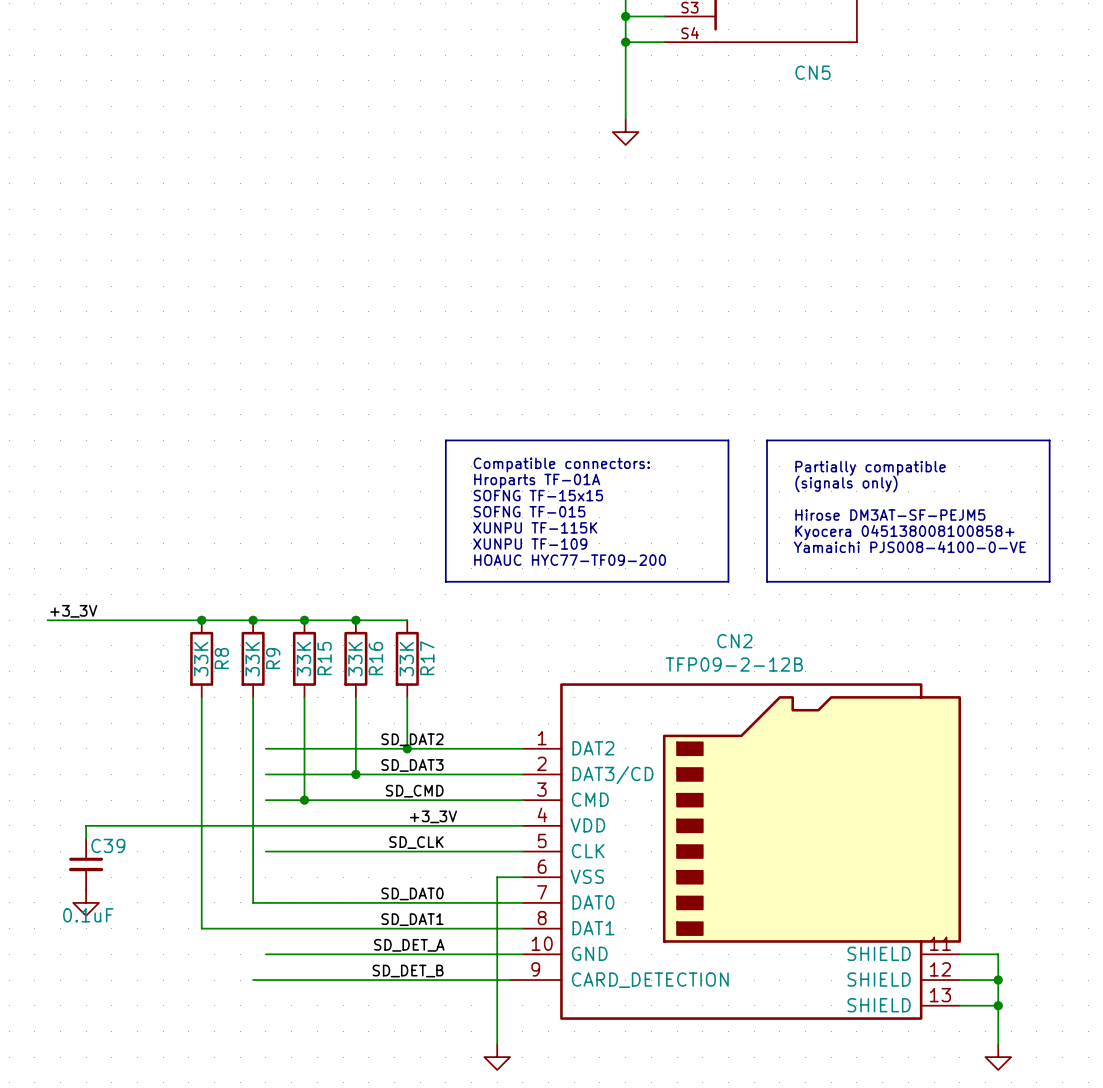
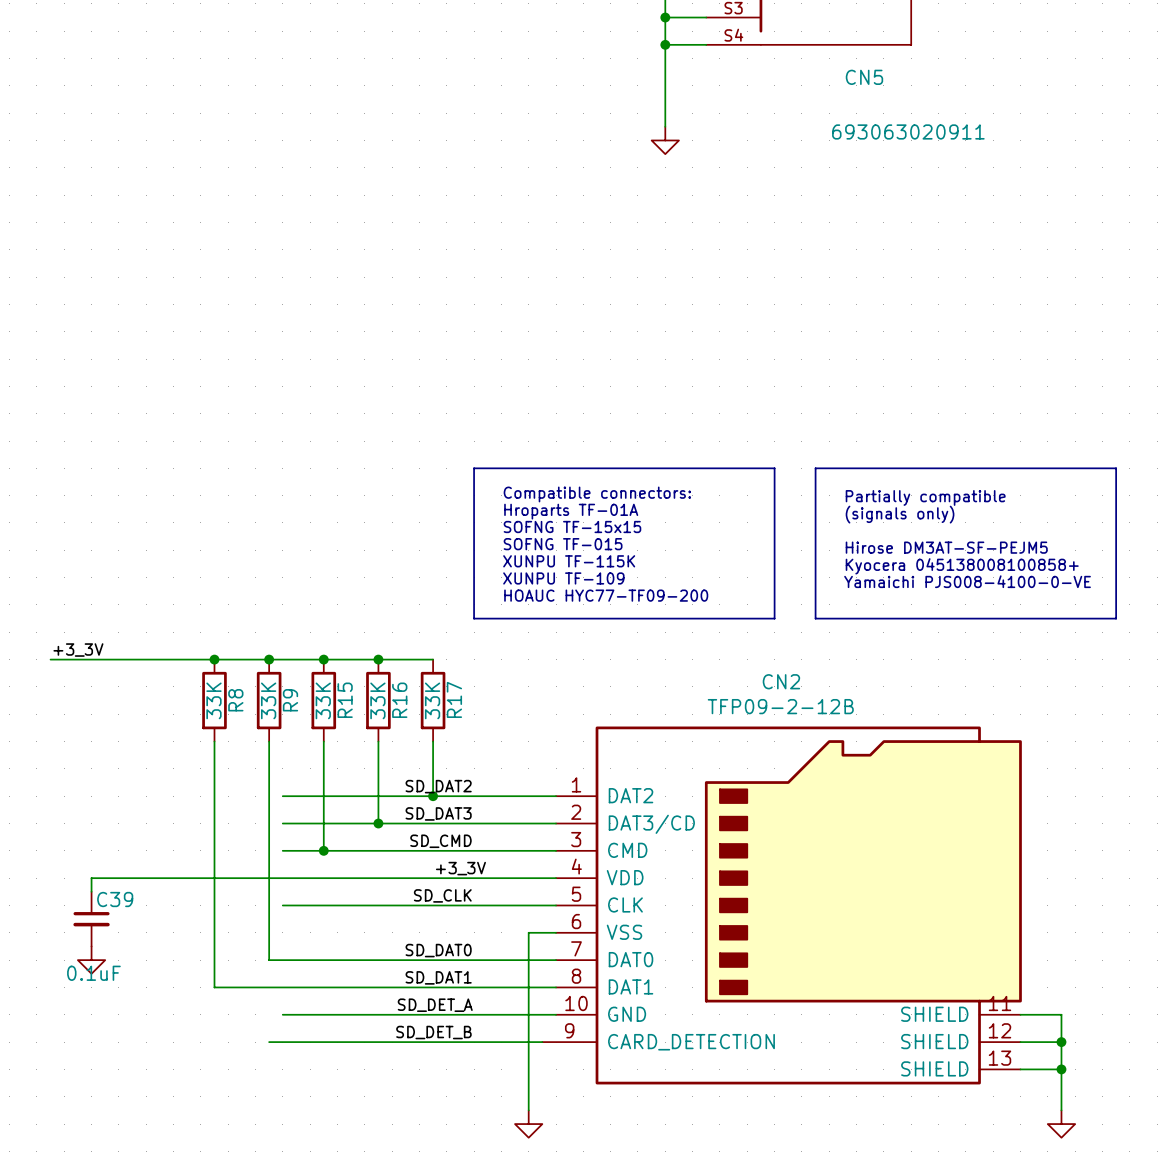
CN5 value: none -> 693063020911 (908, 131)

